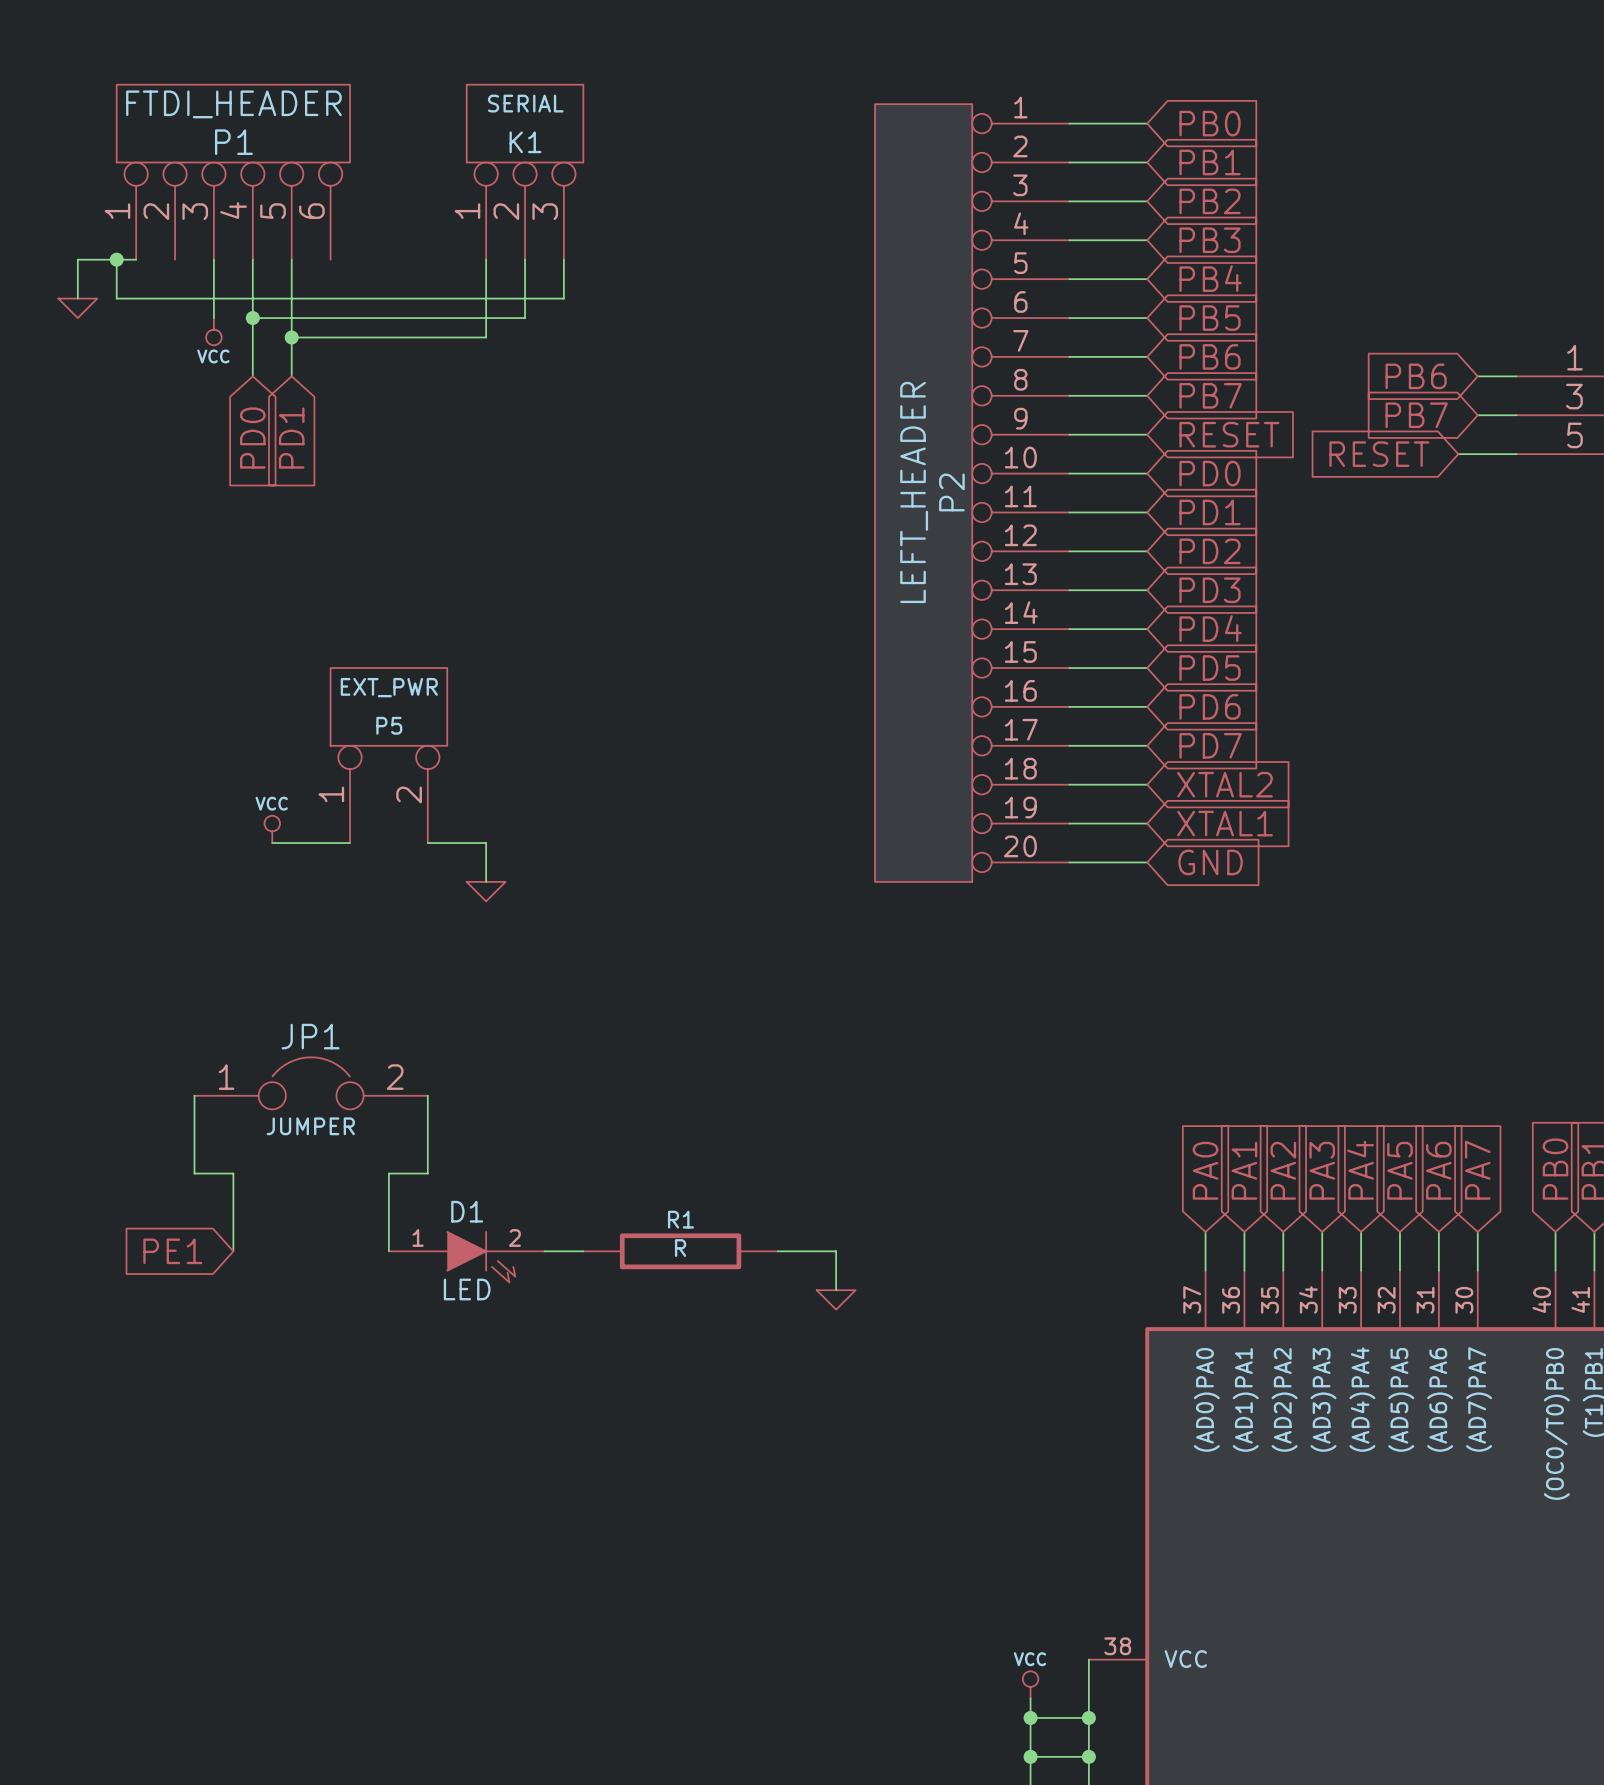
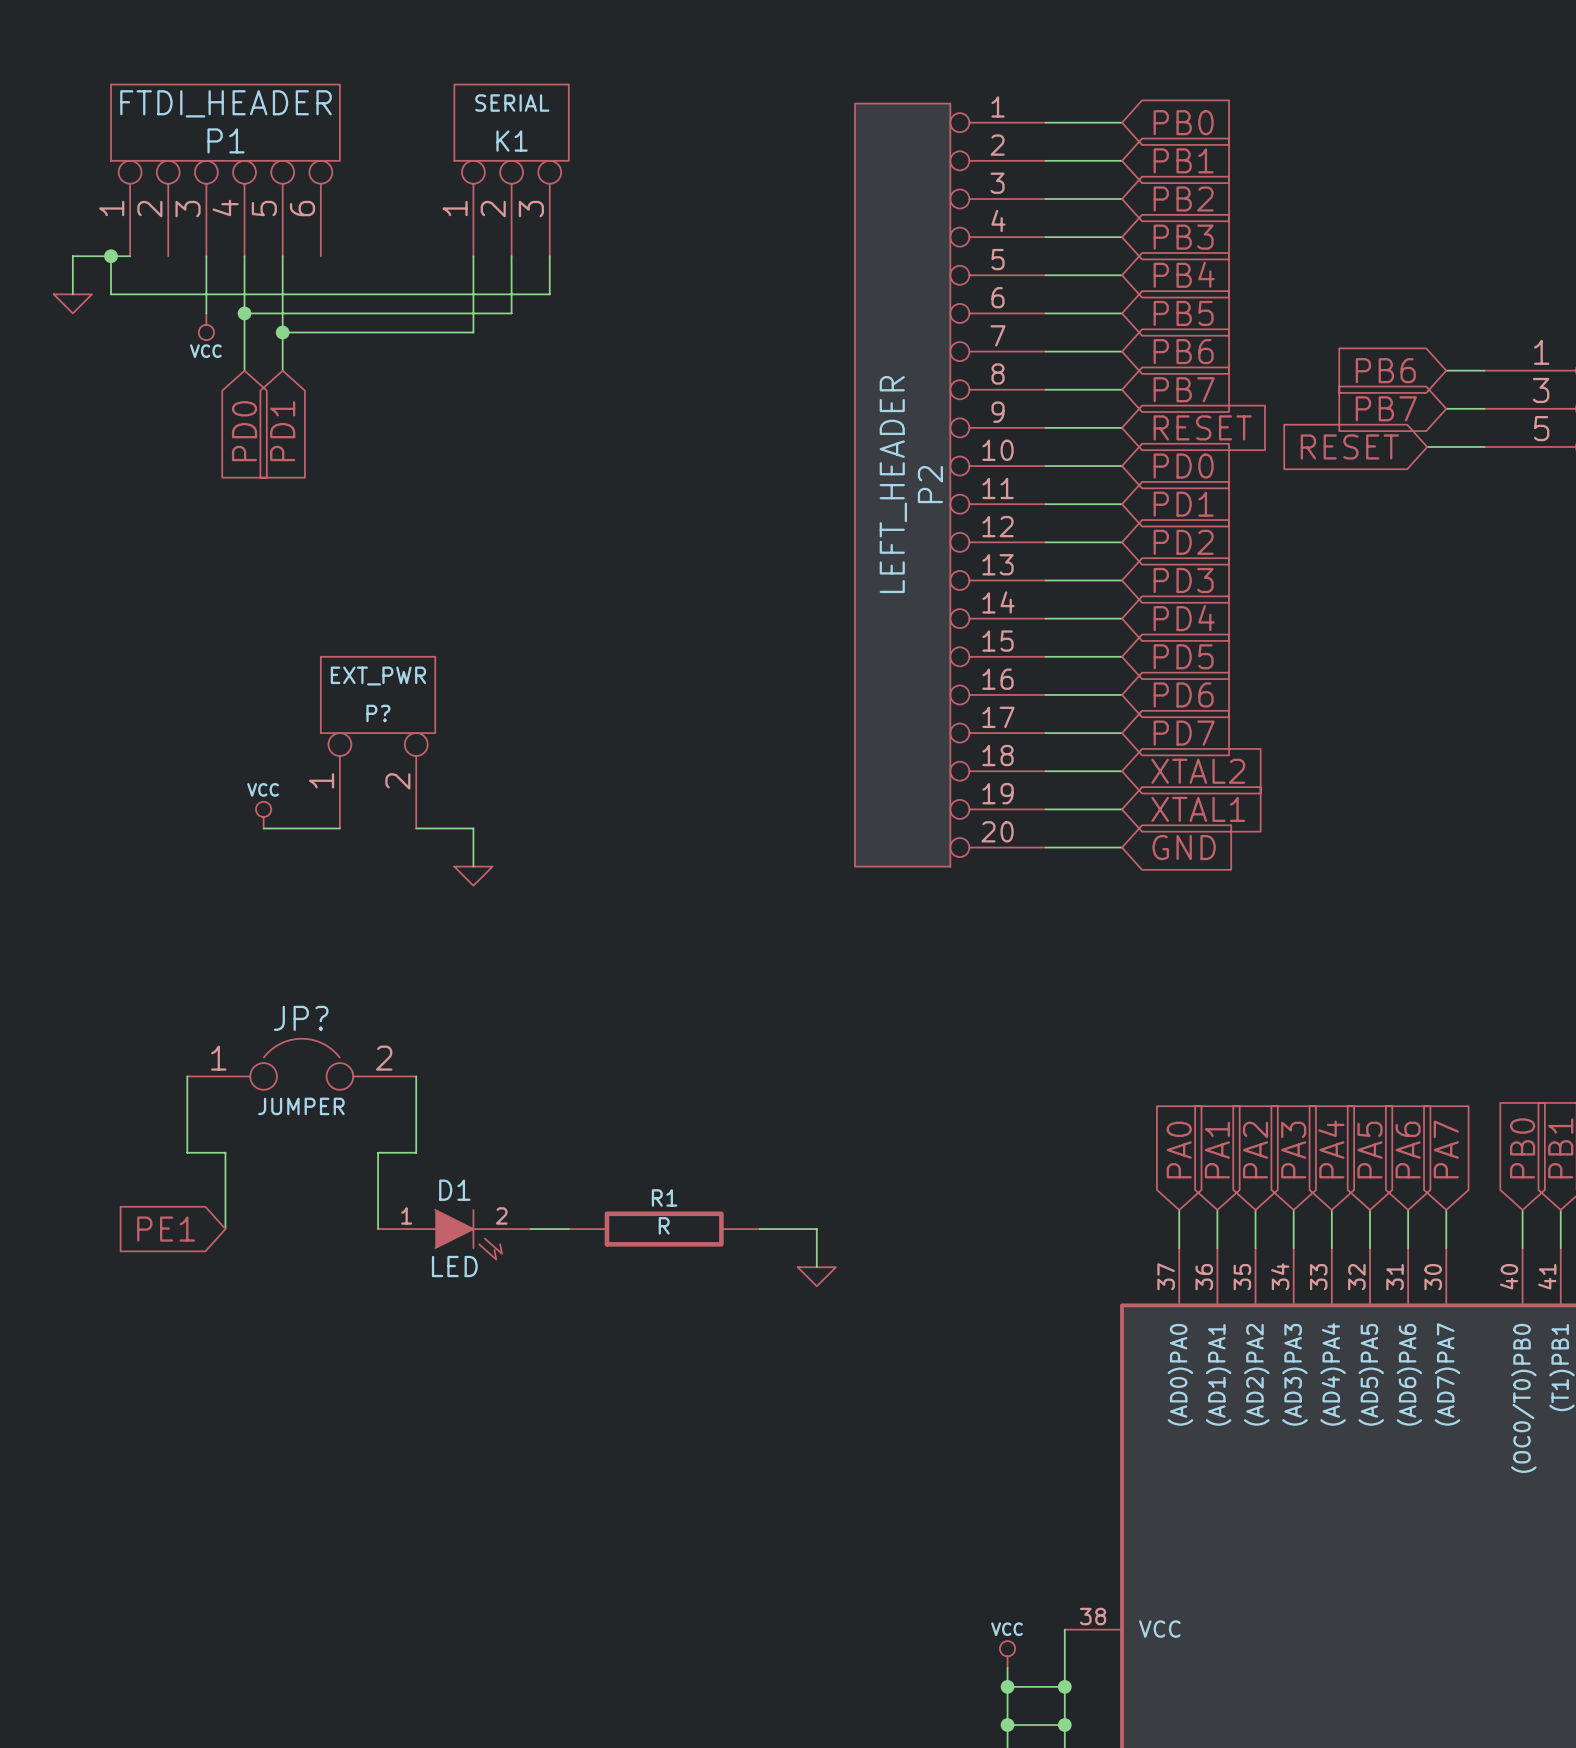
P5 name: P5 (389, 725) -> P? (378, 713)
JP1 name: JP1 (310, 1036) -> JP? (301, 1018)

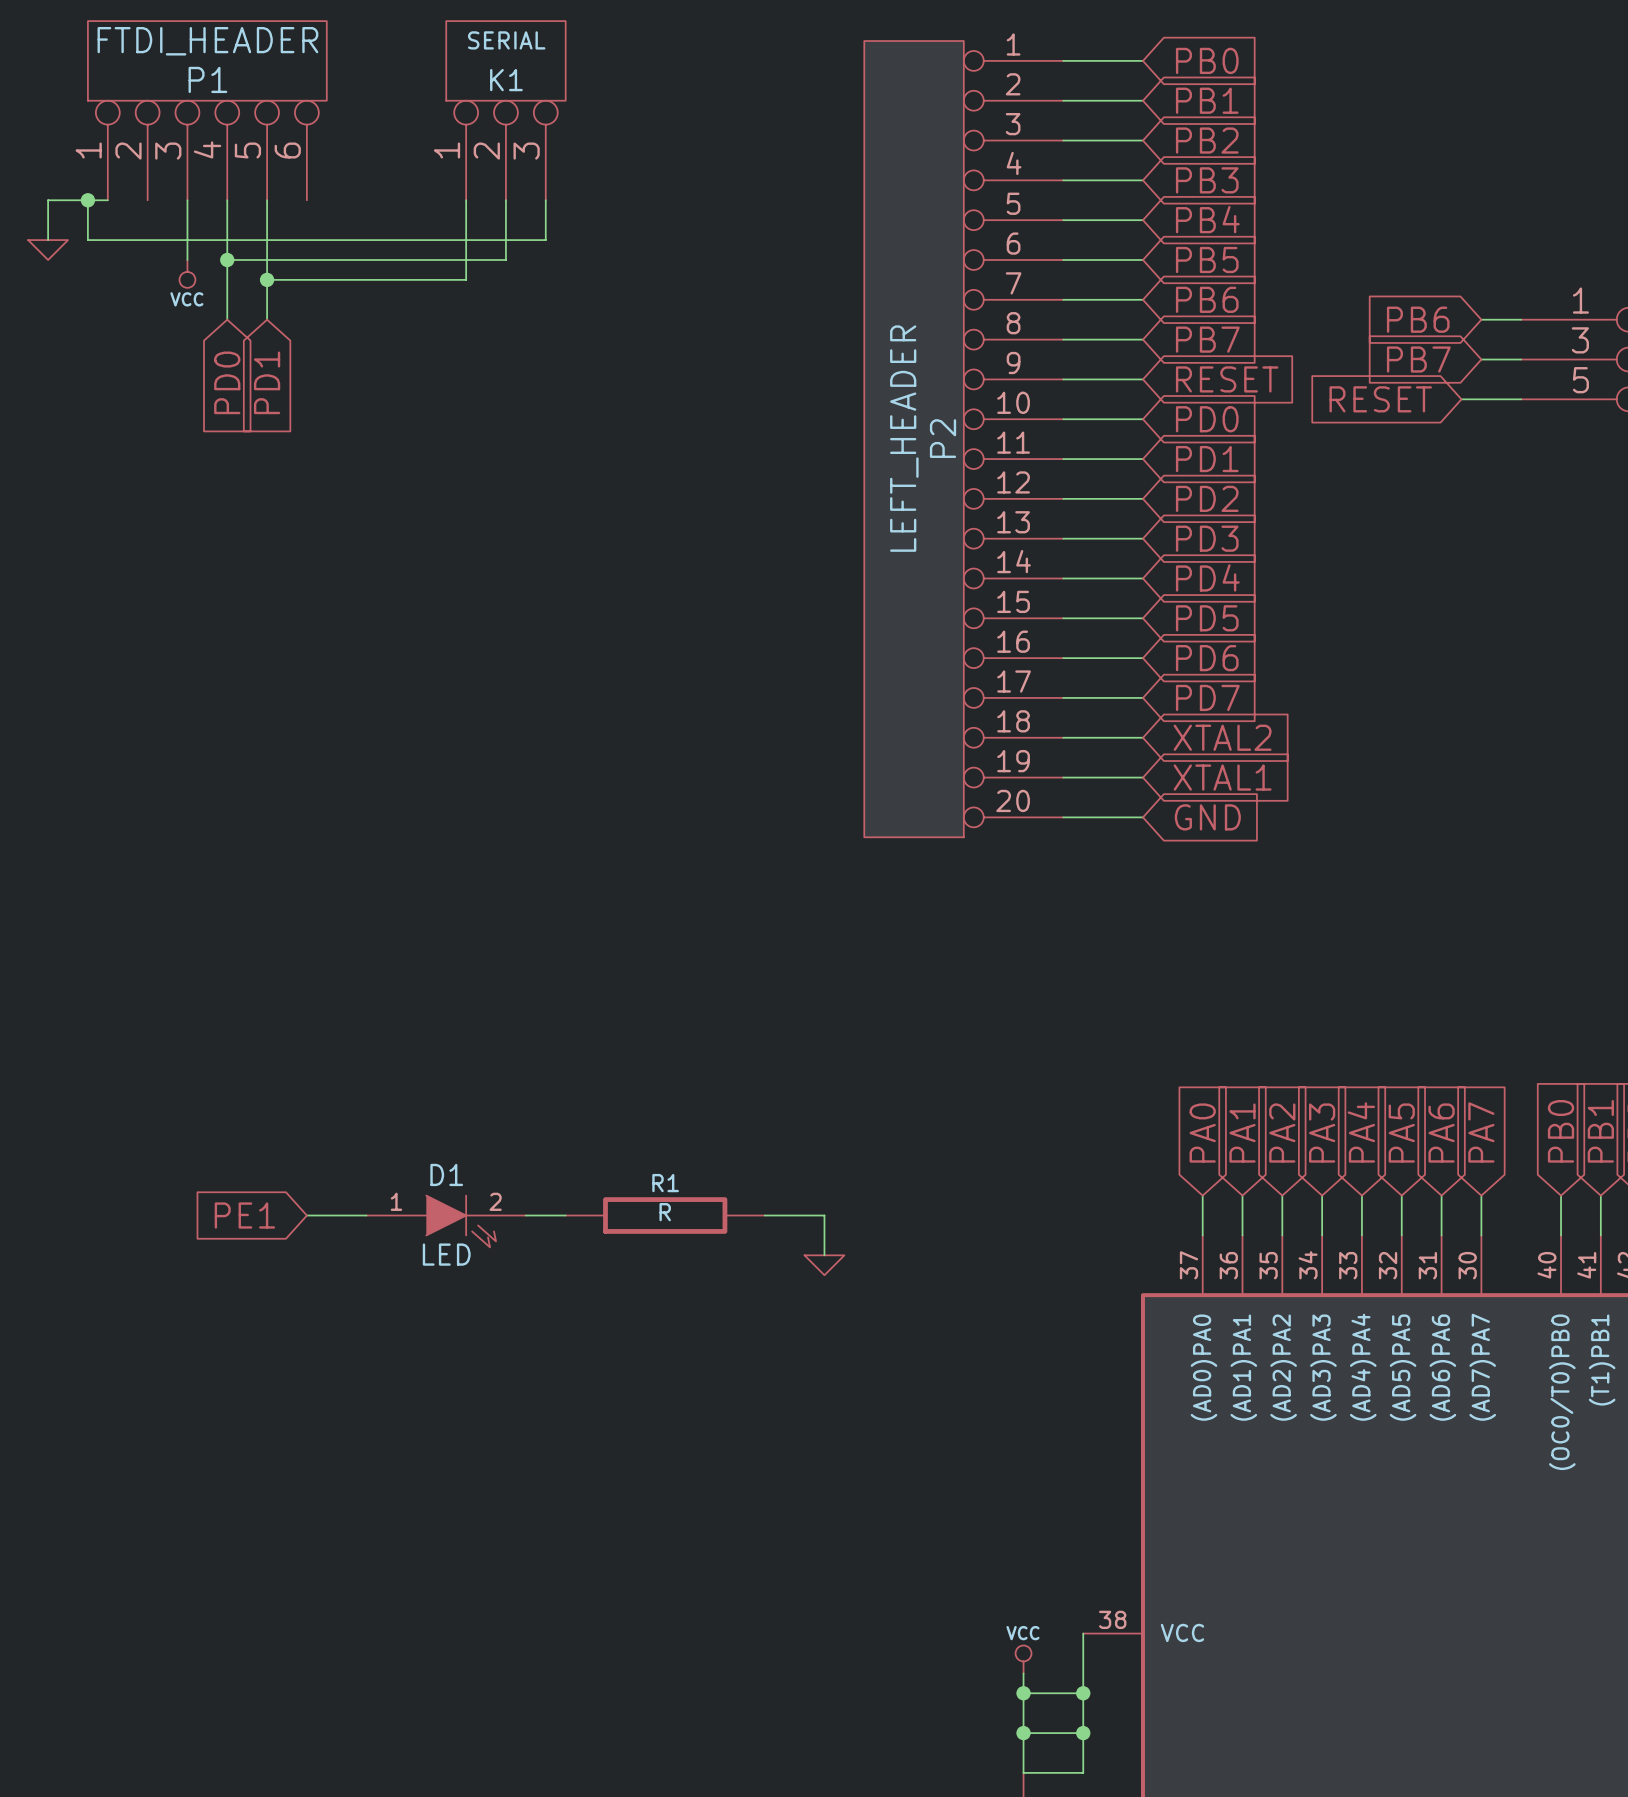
P?: EXT_PWR (378, 742) -> none
power symbol: VCC (263, 815) -> none
wire: (263, 828) (339, 828) -> none
wire: (416, 828) (473, 828) (473, 866) -> none
power symbol: (473, 876) -> none
JP?: JUMPER (301, 1064) -> none
wire: (187, 1076) (187, 1152) (225, 1152) (225, 1229) -> none
wire: (416, 1076) (416, 1152) (378, 1152) (378, 1229) -> (306, 1215) (366, 1215)
global label position: PE1 (166, 1229) -> PE1 (244, 1215)

